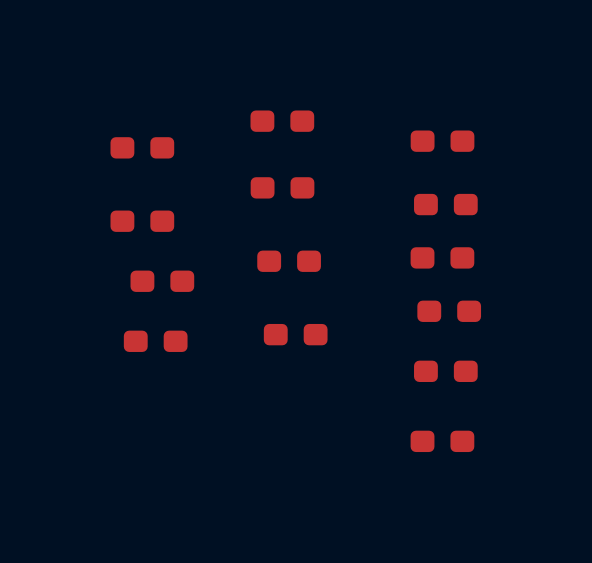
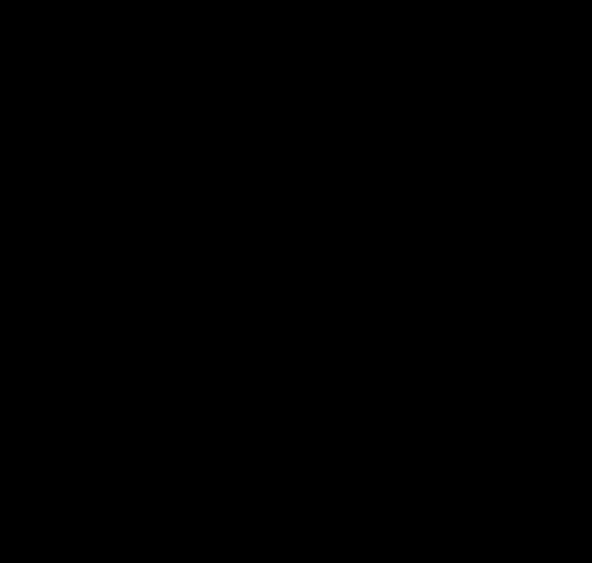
part: (282, 121) -> none
part: (442, 141) -> none
part: (142, 147) -> none
part: (282, 187) -> none
part: (445, 204) -> none
part: (142, 221) -> none
part: (442, 257) -> none
part: (289, 261) -> none
part: (162, 281) -> none
part: (449, 311) -> none
part: (295, 334) -> none
part: (155, 341) -> none
part: (445, 371) -> none
part: (442, 441) -> none

